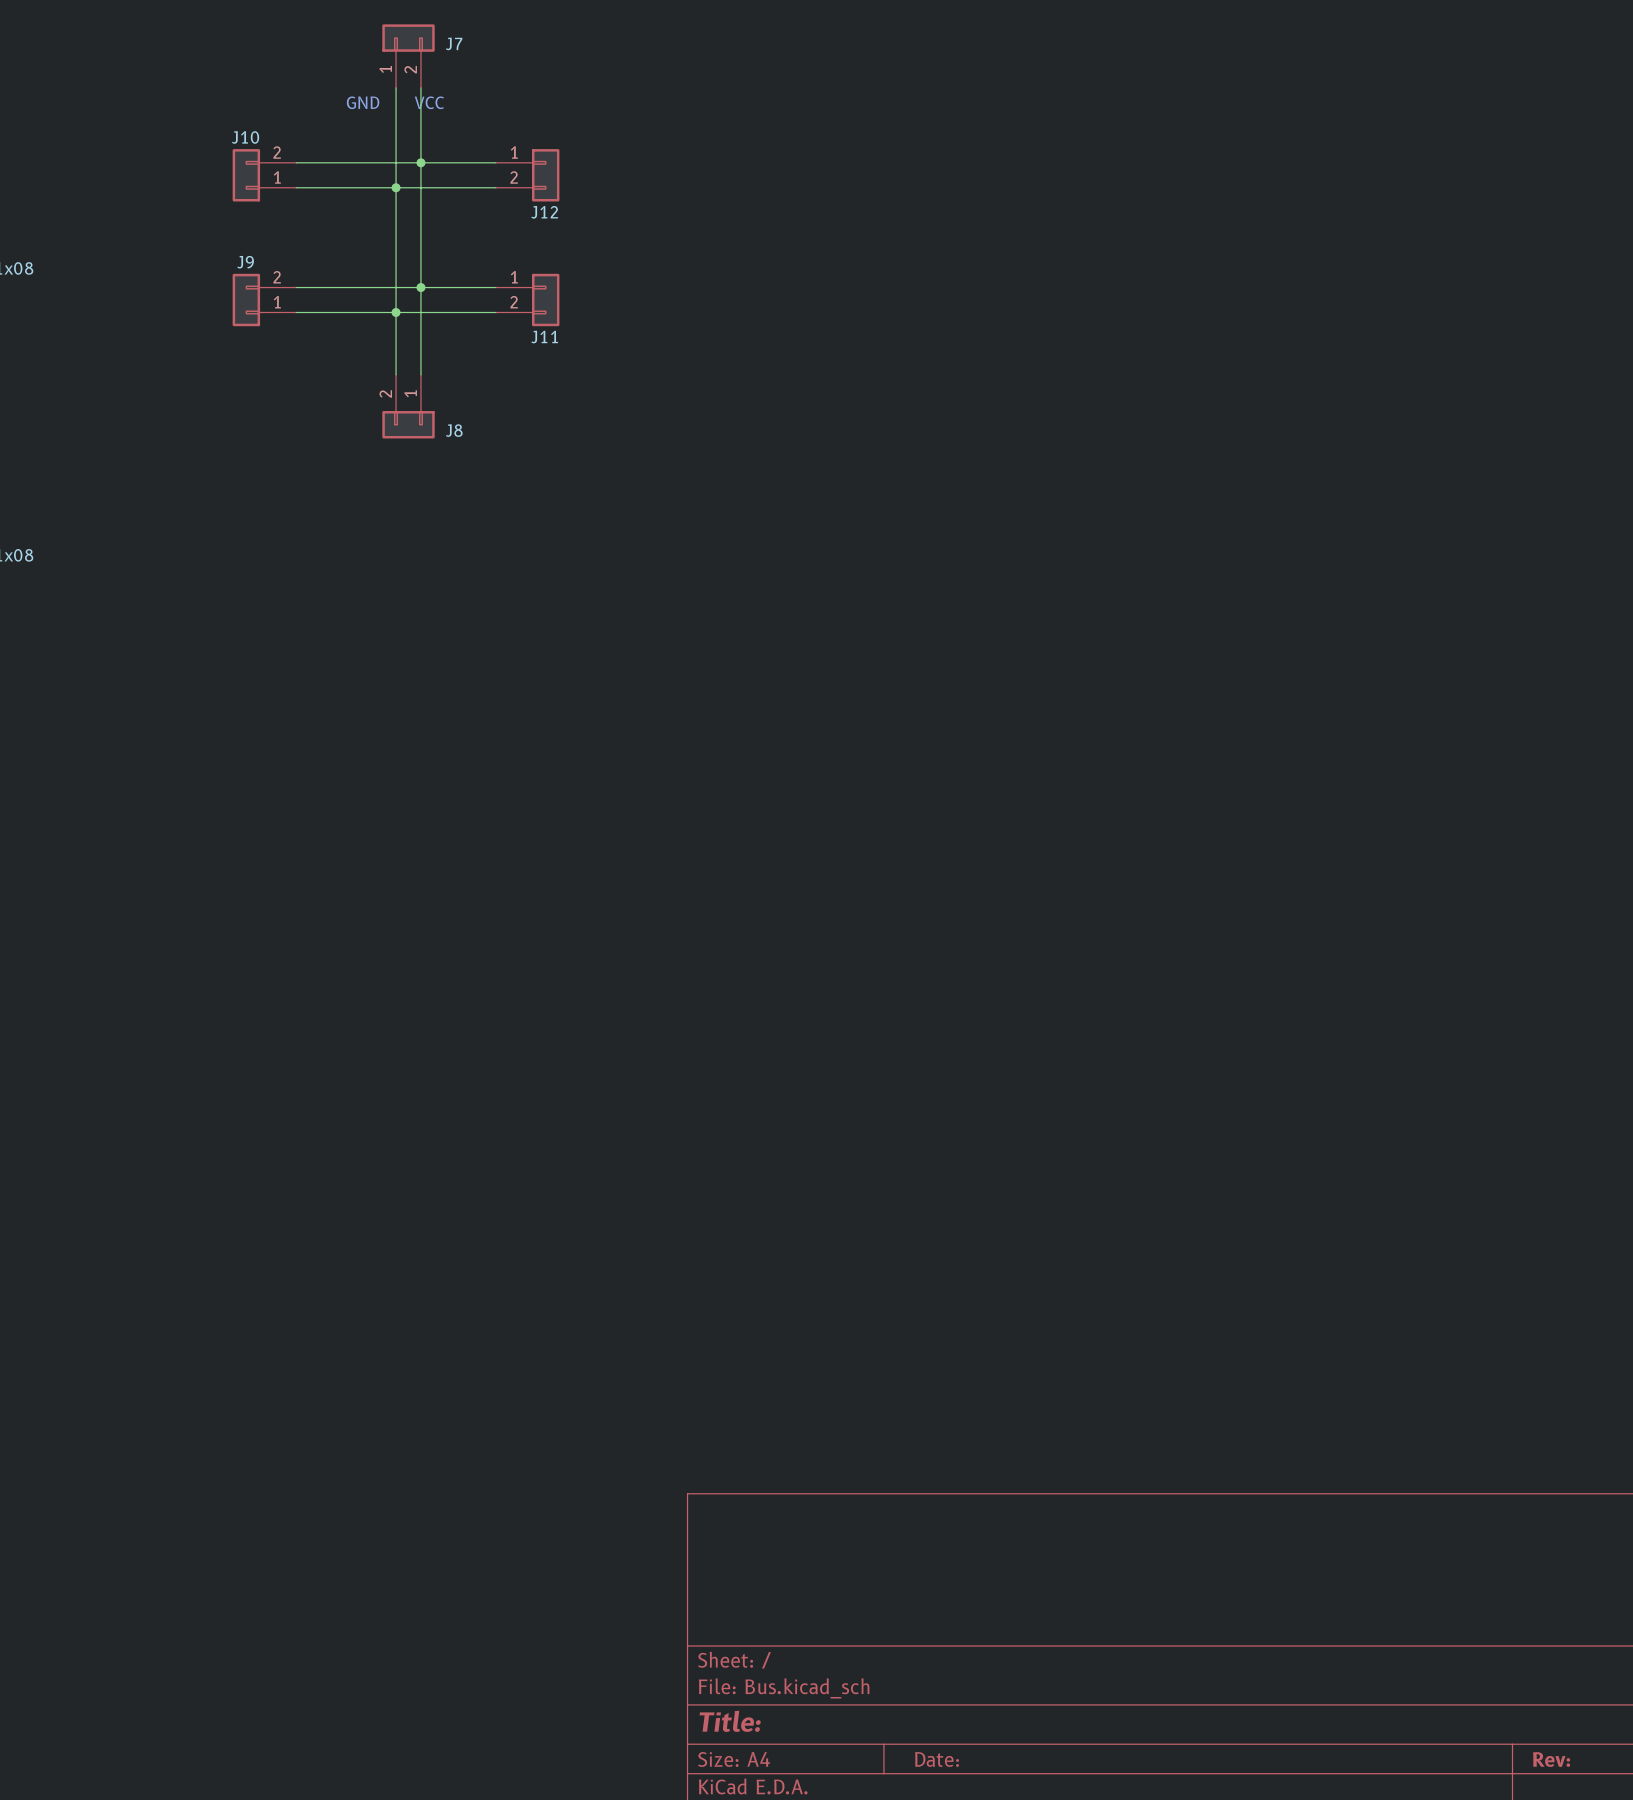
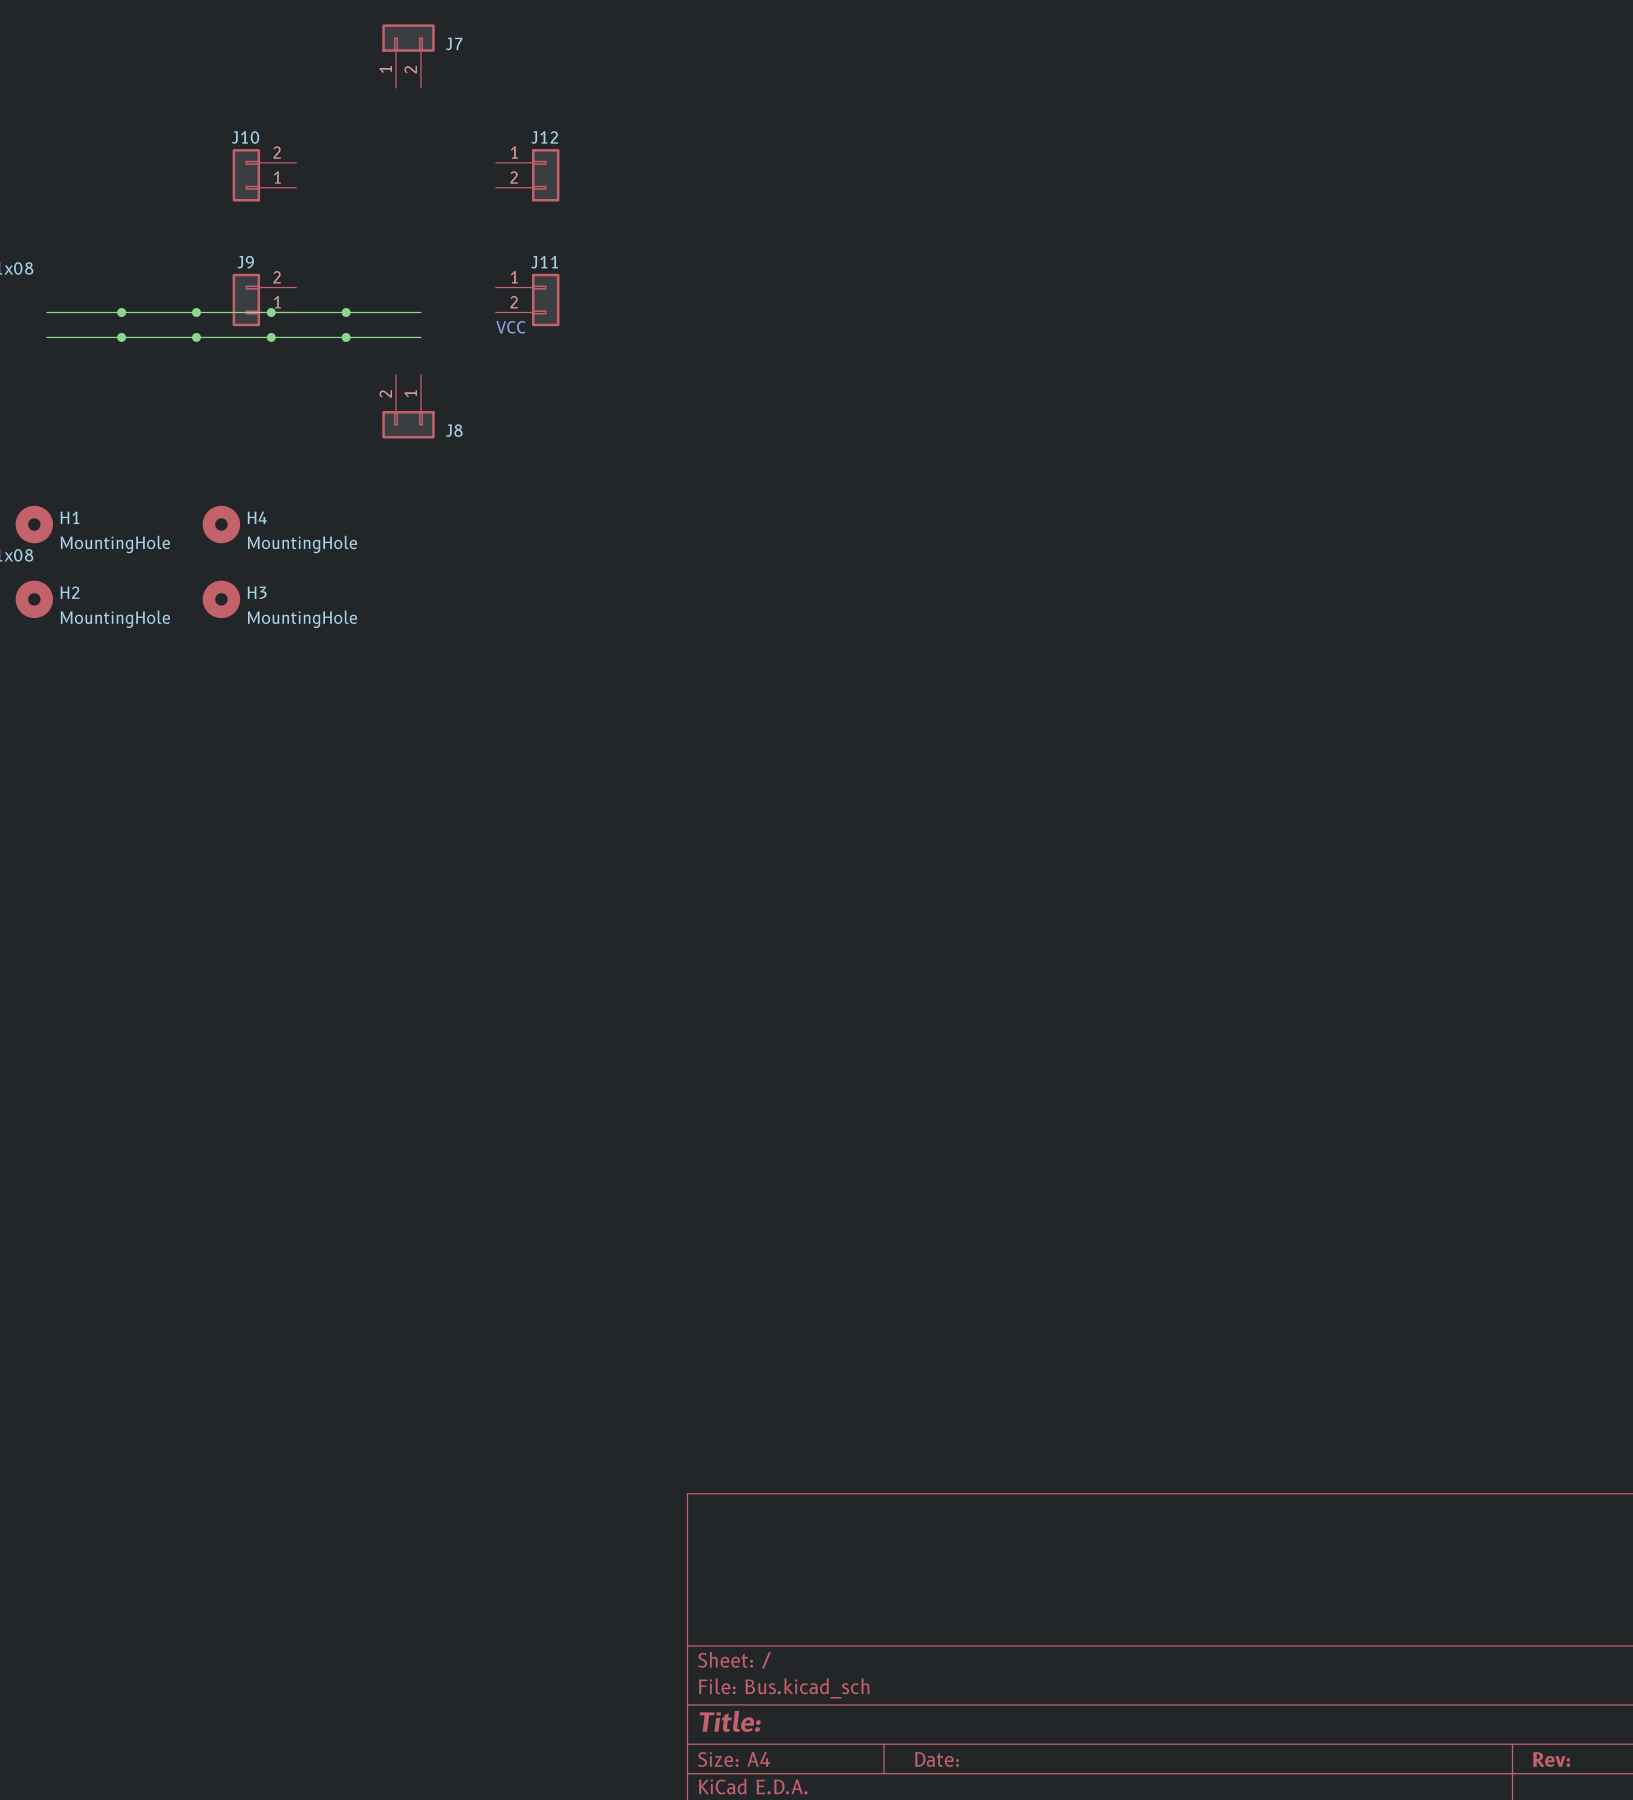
wire: (396, 87) (396, 374) -> none
wire: (420, 87) (420, 374) -> none
text: GND VCC (395, 102) -> none
wire: (296, 162) (495, 162) -> none
junction: (420, 162) -> none
wire: (296, 187) (495, 187) -> none
junction: (396, 187) -> none
J12 name position: J12 (544, 212) -> J12 (544, 137)
wire: (296, 287) (495, 287) -> none
junction: (420, 287) -> none
wire: none -> (46, 312) (296, 312)
junction: none -> (121, 312)
junction: none -> (196, 312)
junction: none -> (271, 312)
junction: none -> (346, 312)
junction: (396, 312) -> none
wire: (420, 312) (495, 312) -> none
text: none -> VCC (510, 327)
wire: none -> (46, 337) (420, 337)
junction: none -> (121, 337)
junction: none -> (196, 337)
junction: none -> (271, 337)
junction: none -> (346, 337)
J11 name position: J11 (544, 337) -> J11 (544, 262)
H1: none -> MountingHole (34, 524)
H4: none -> MountingHole (221, 524)
H2: none -> MountingHole (34, 599)
H3: none -> MountingHole (221, 599)

